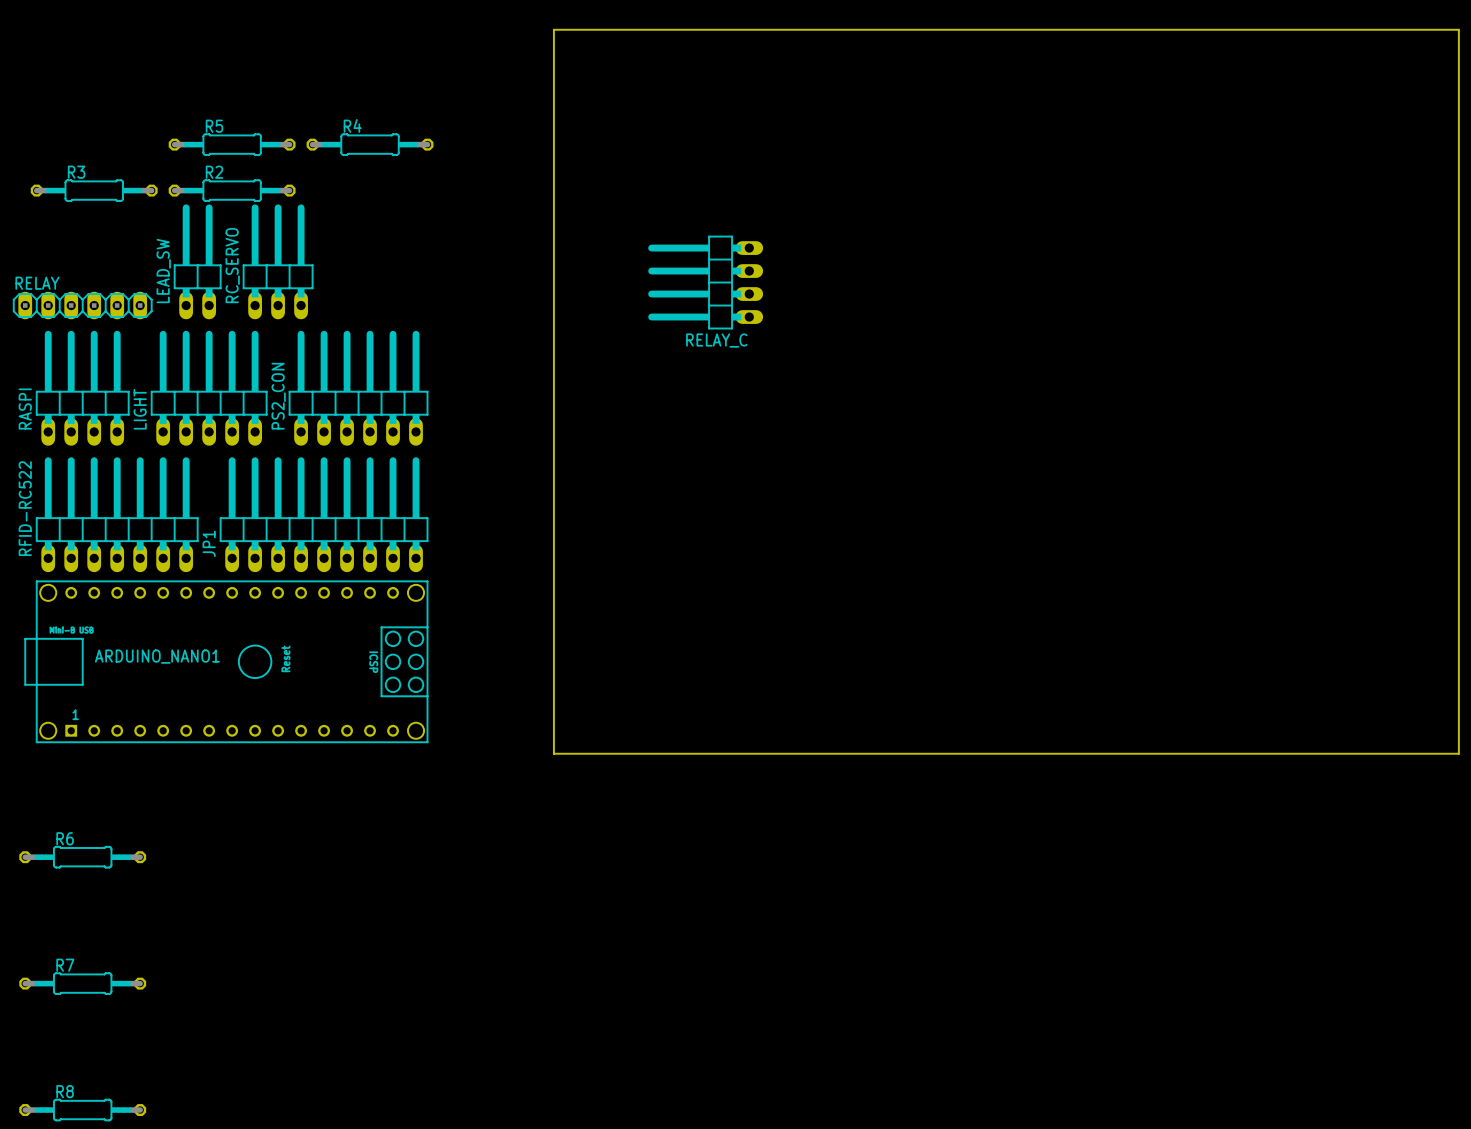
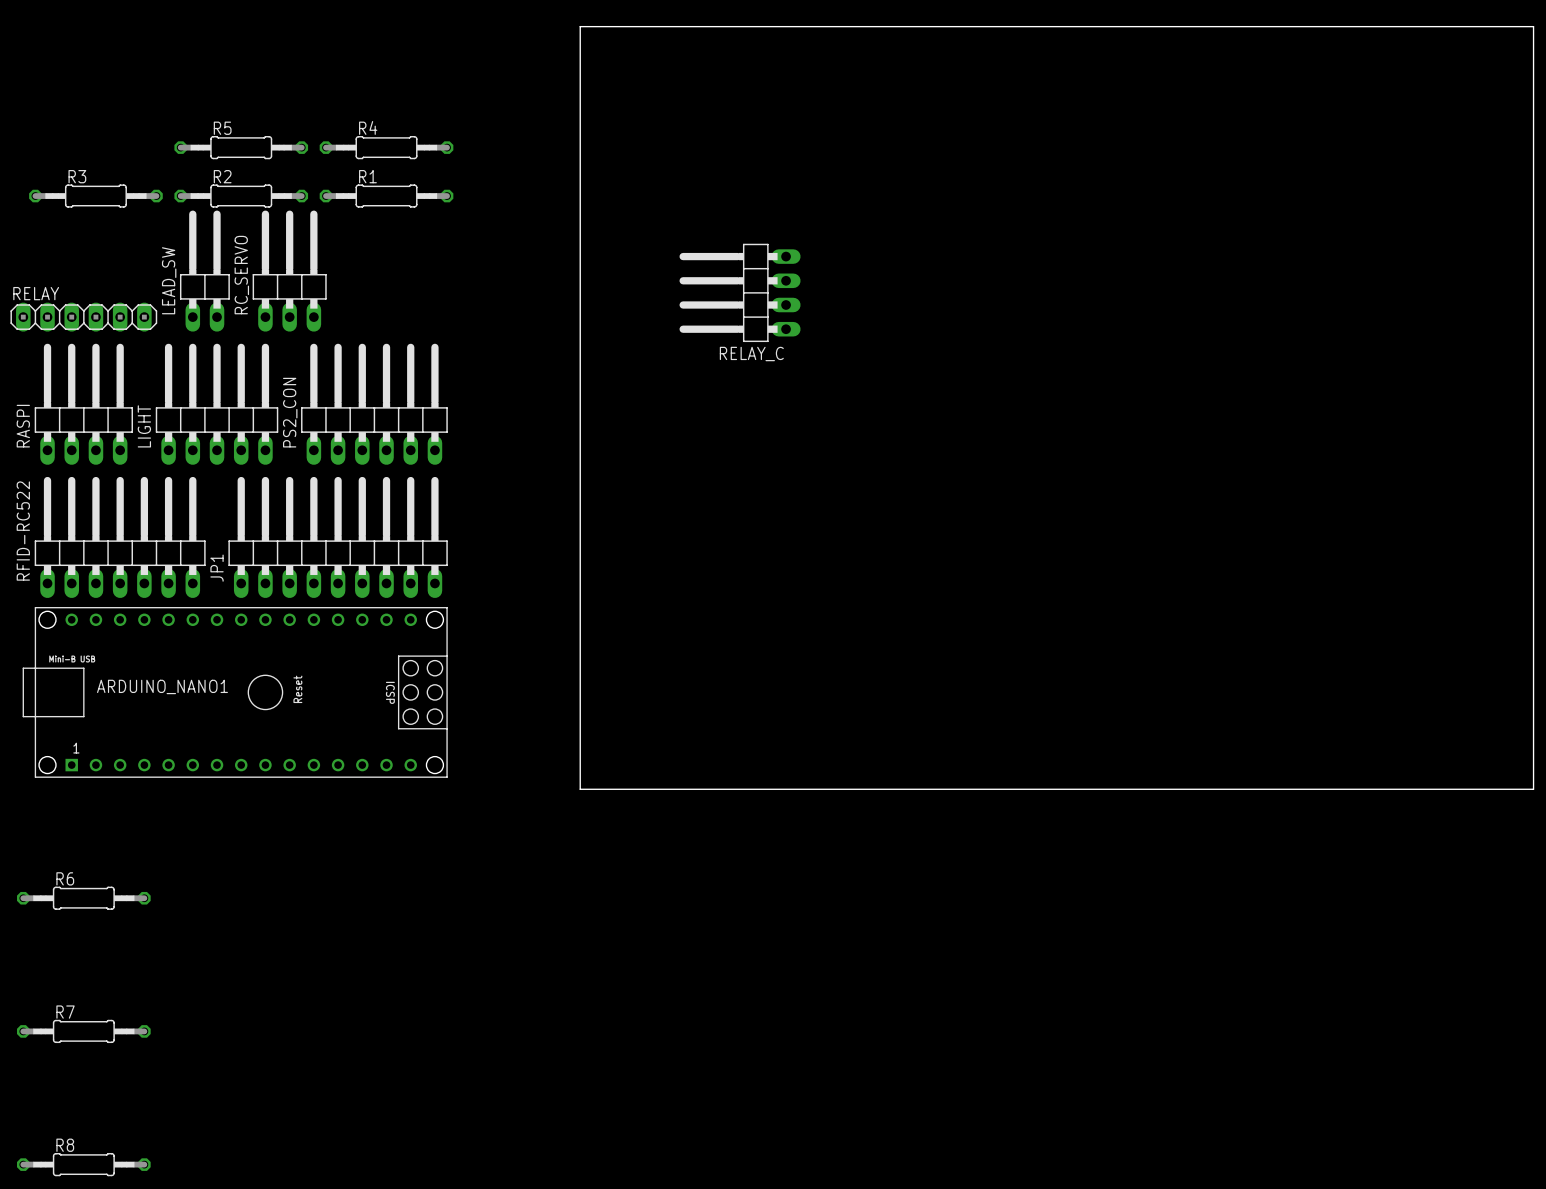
R1: none -> (386, 196)

